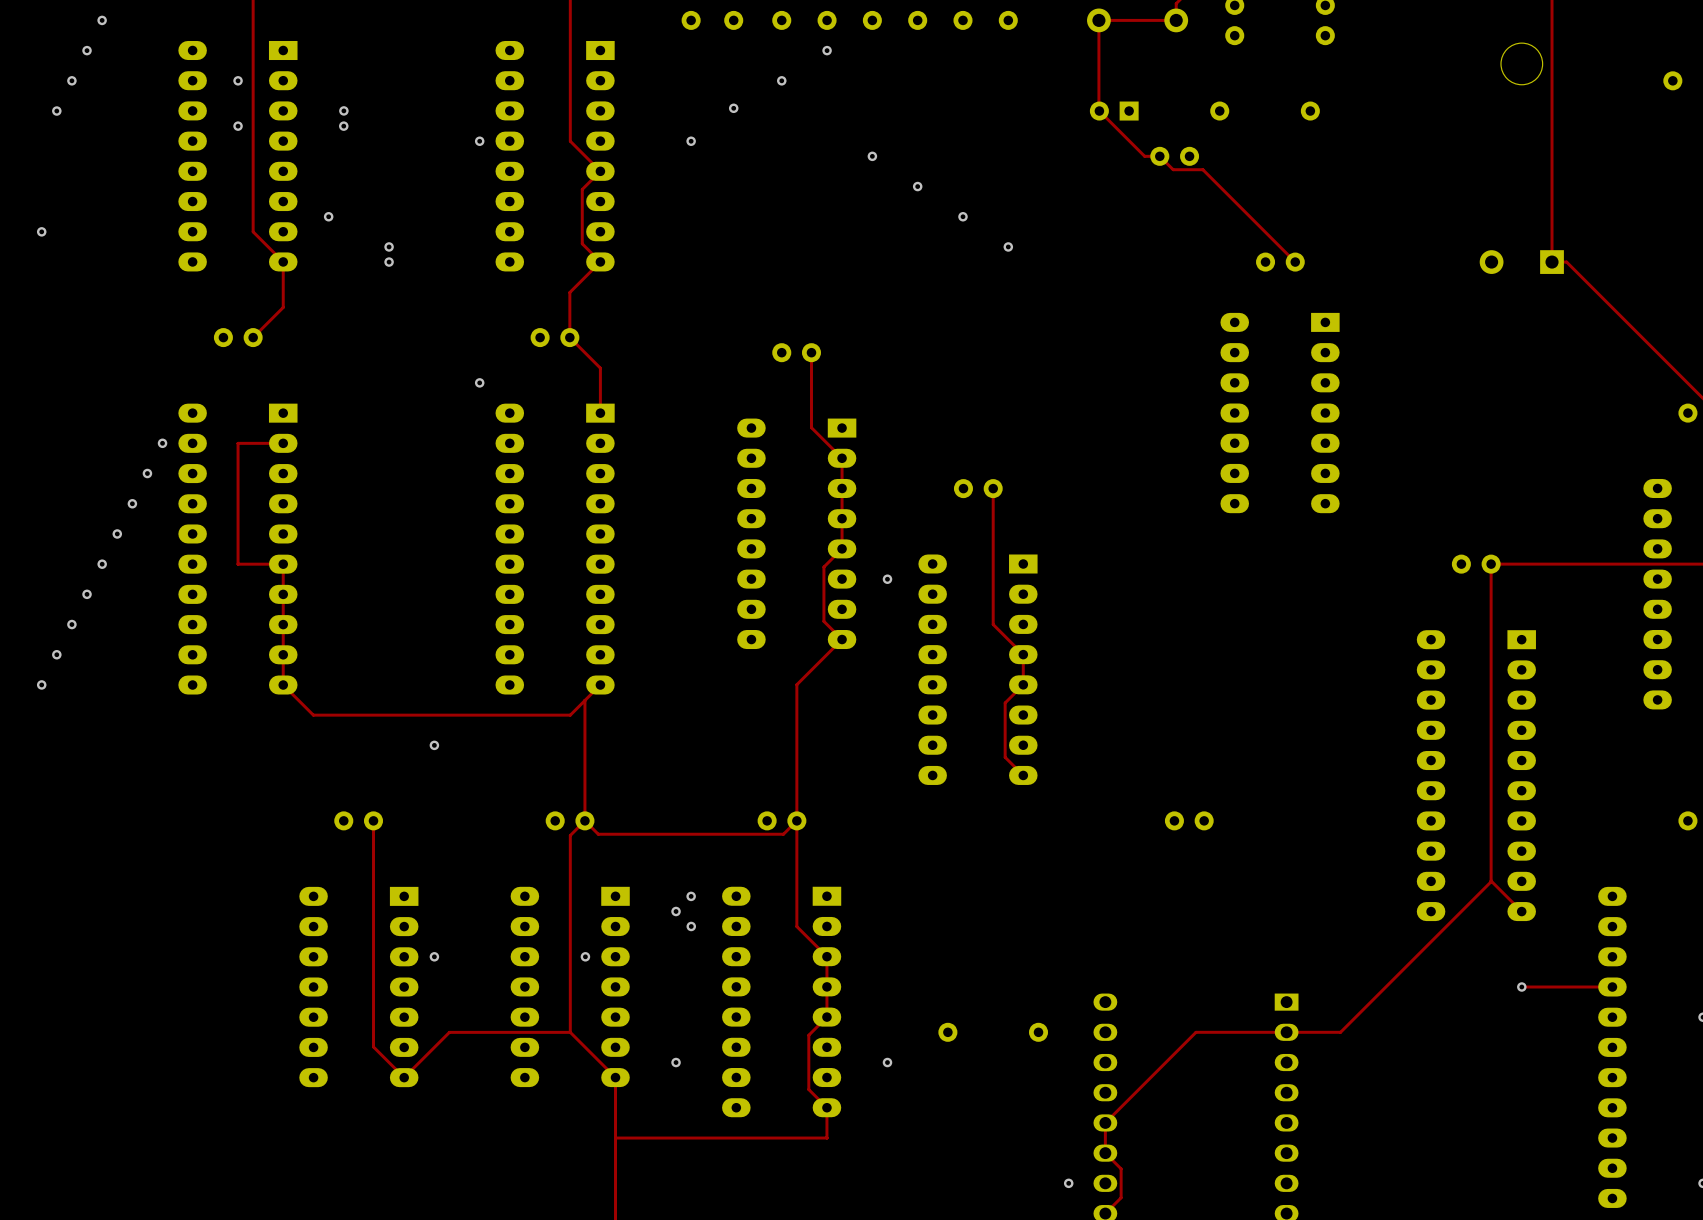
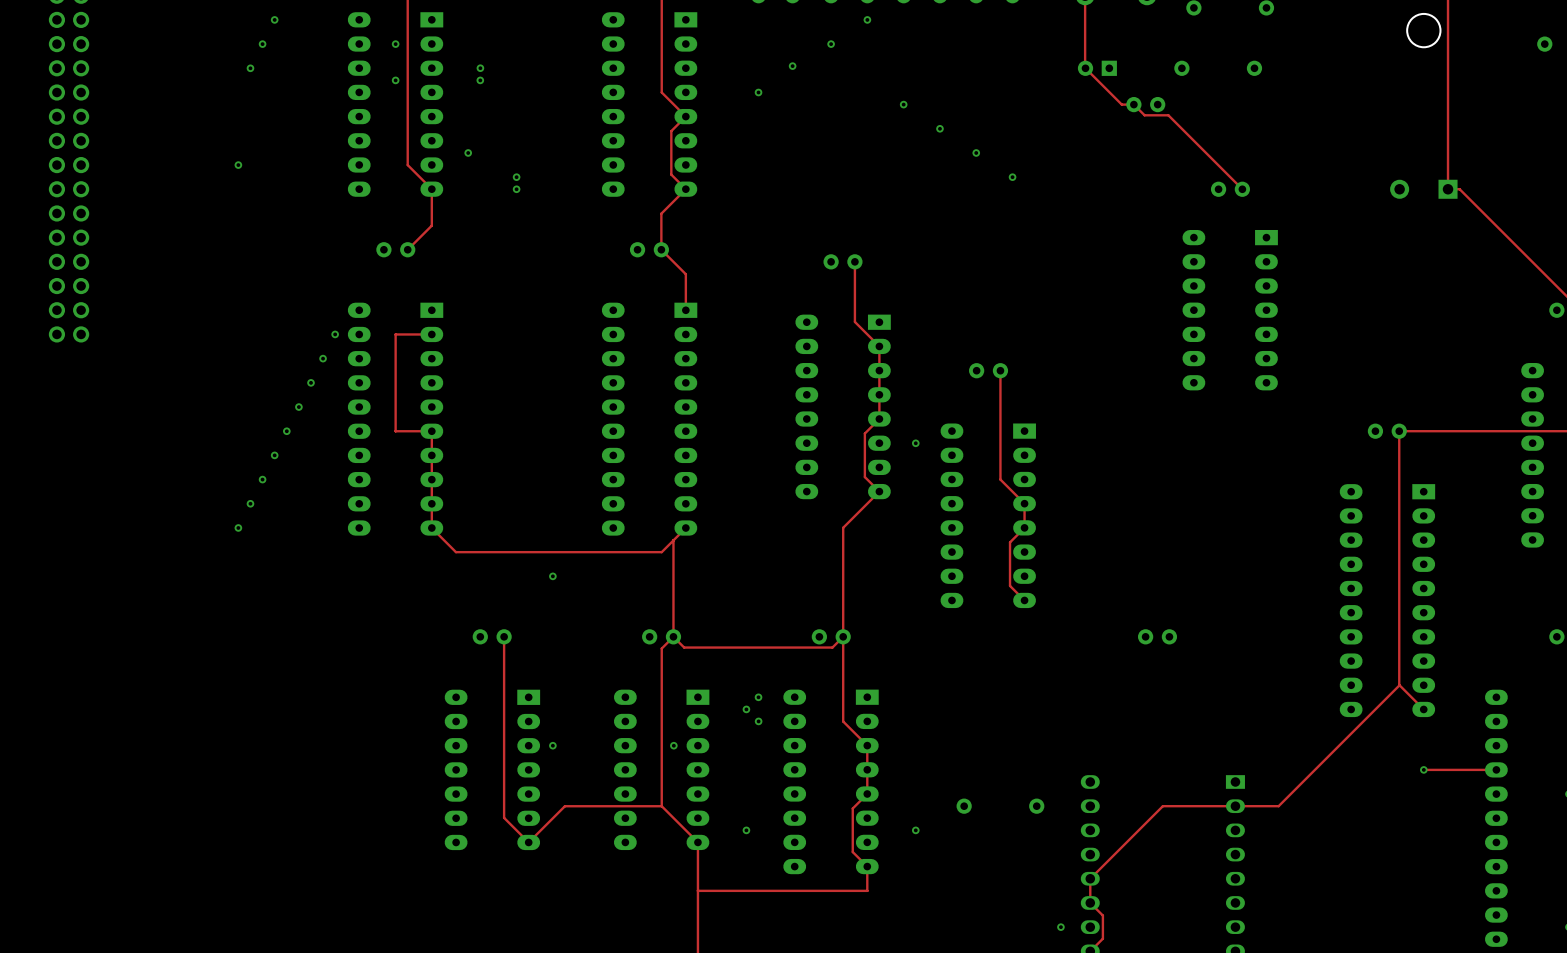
via: (479, 141) -> none
via: (479, 382) -> none

